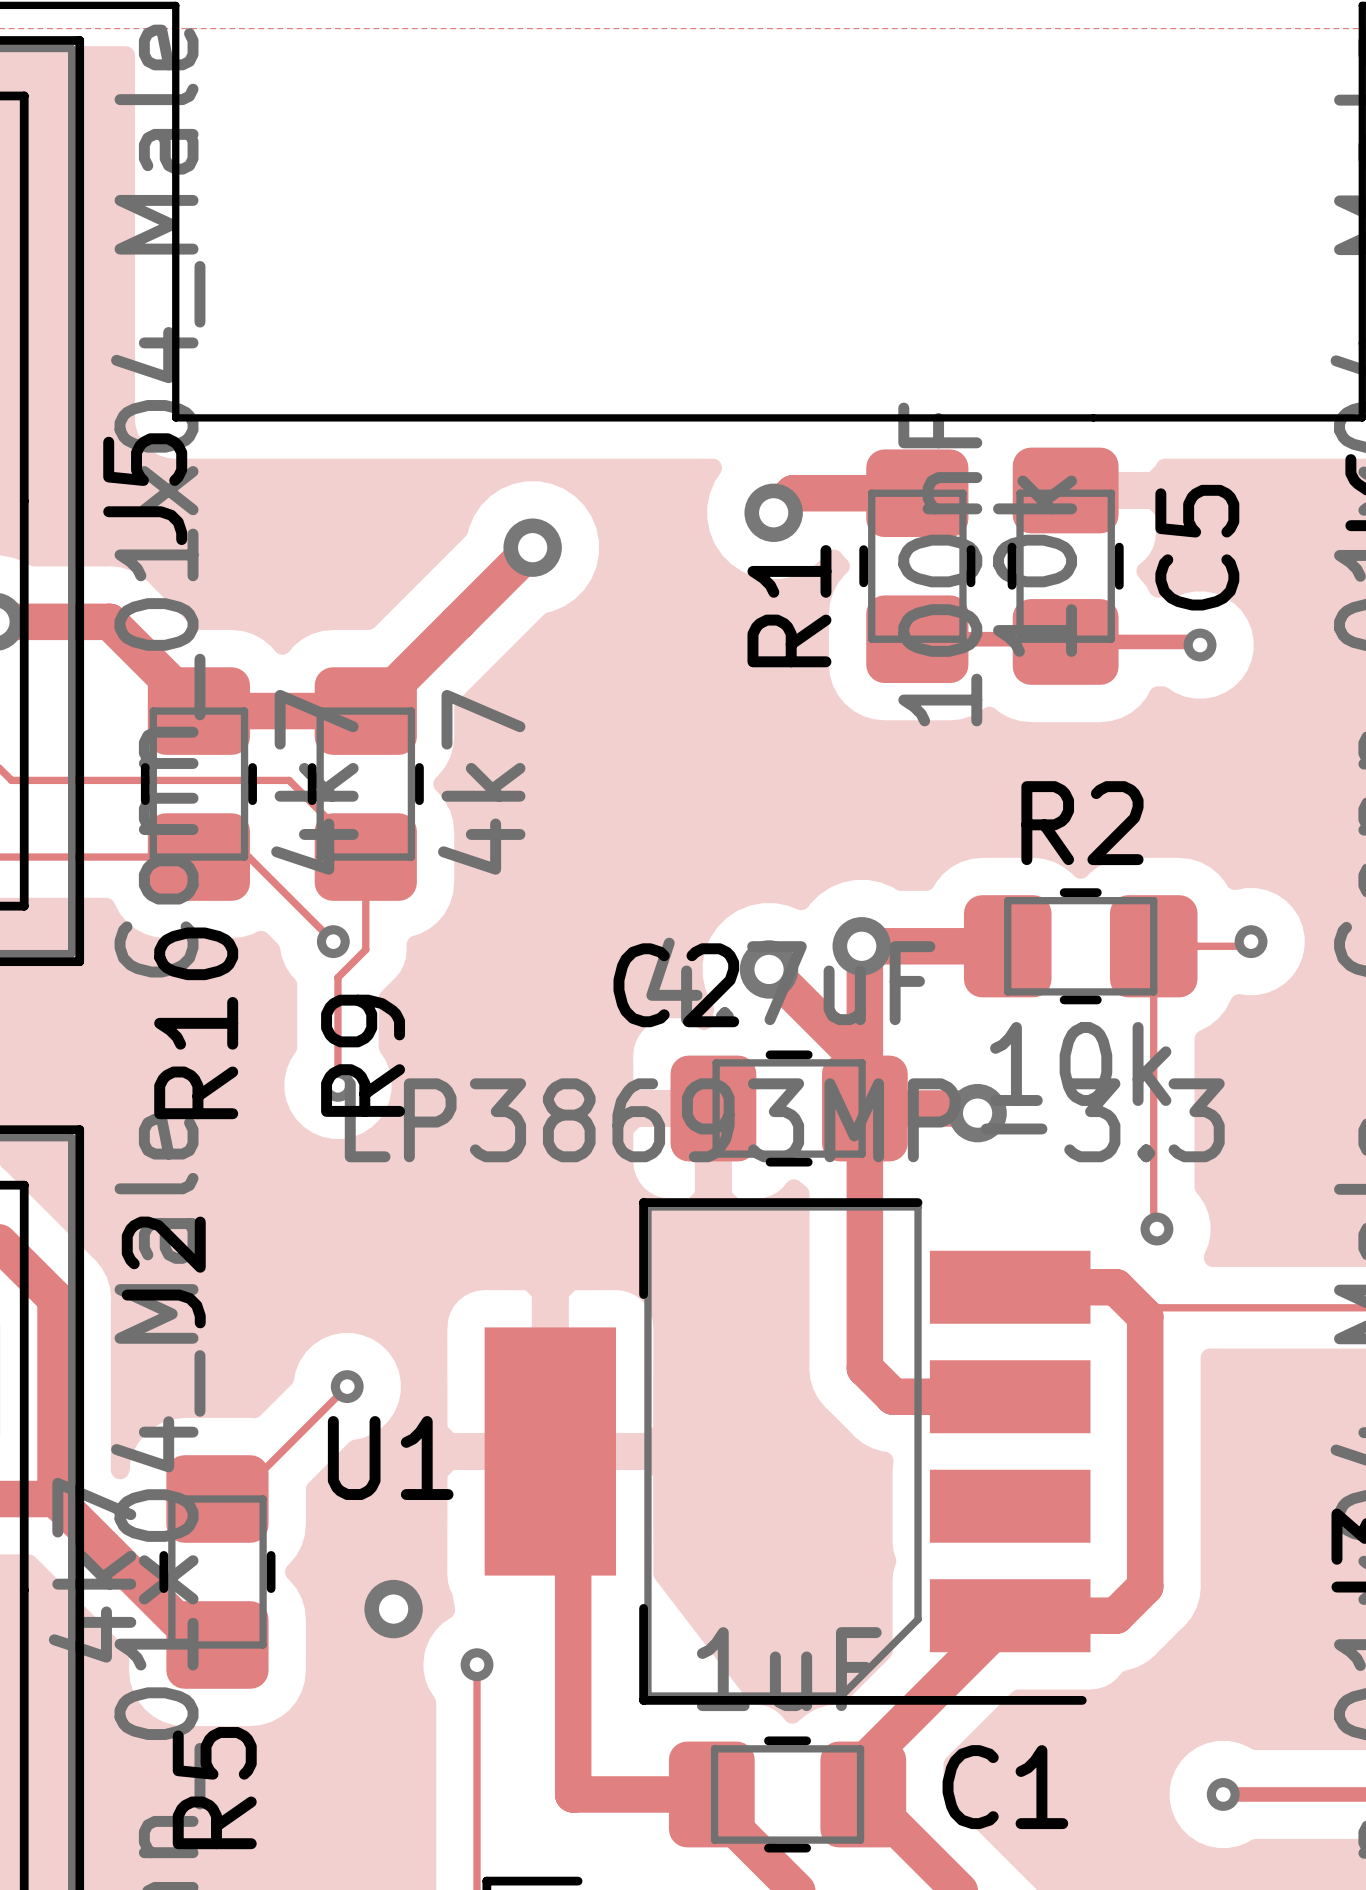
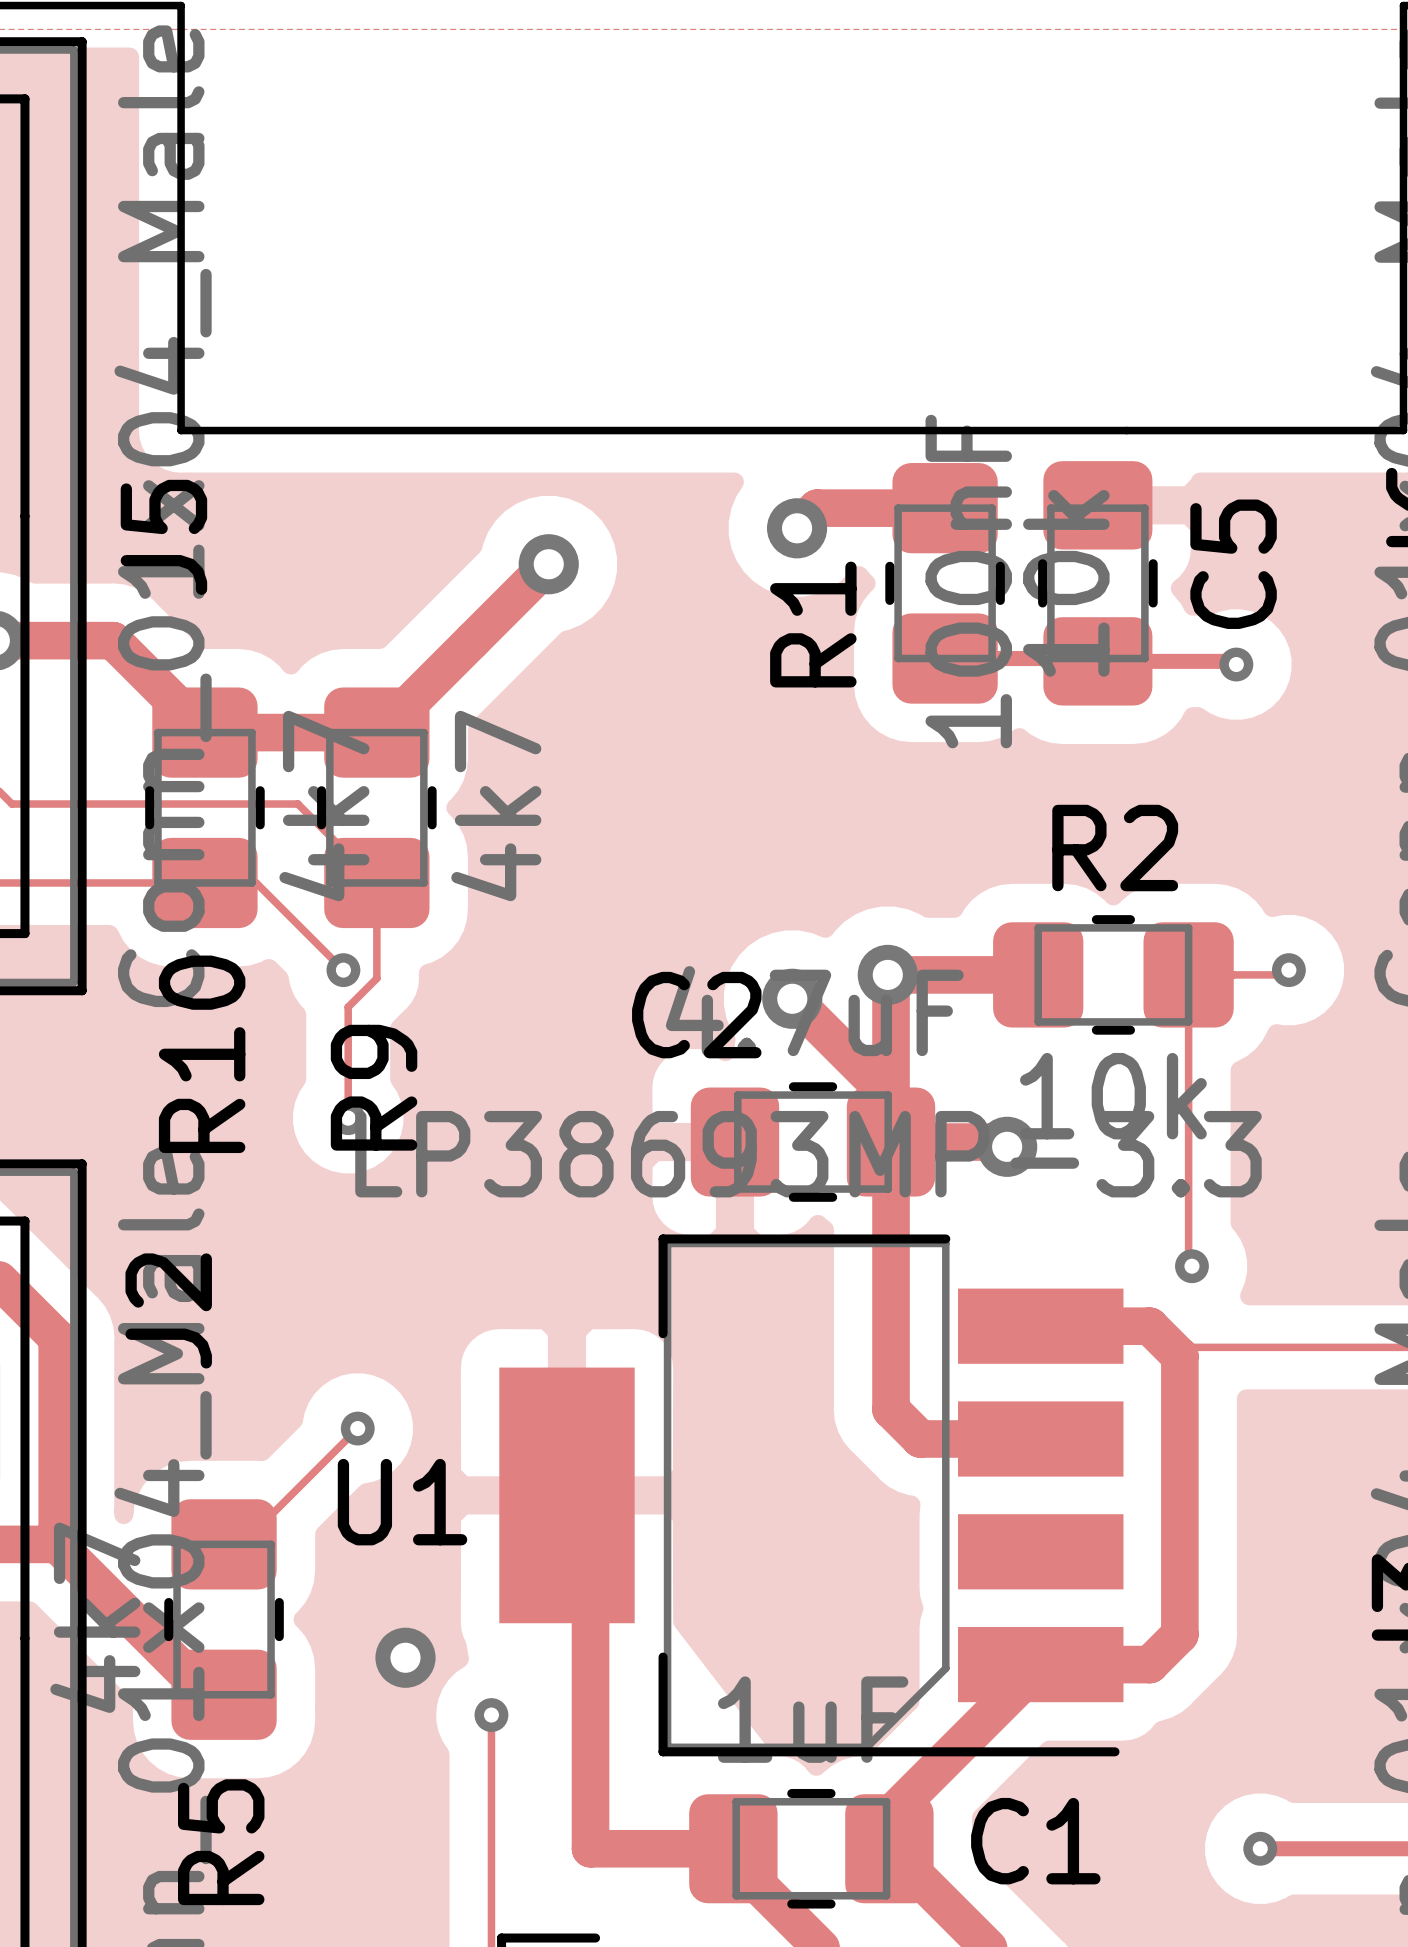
J5 name position: J5 (145, 489) -> J5 (163, 537)

